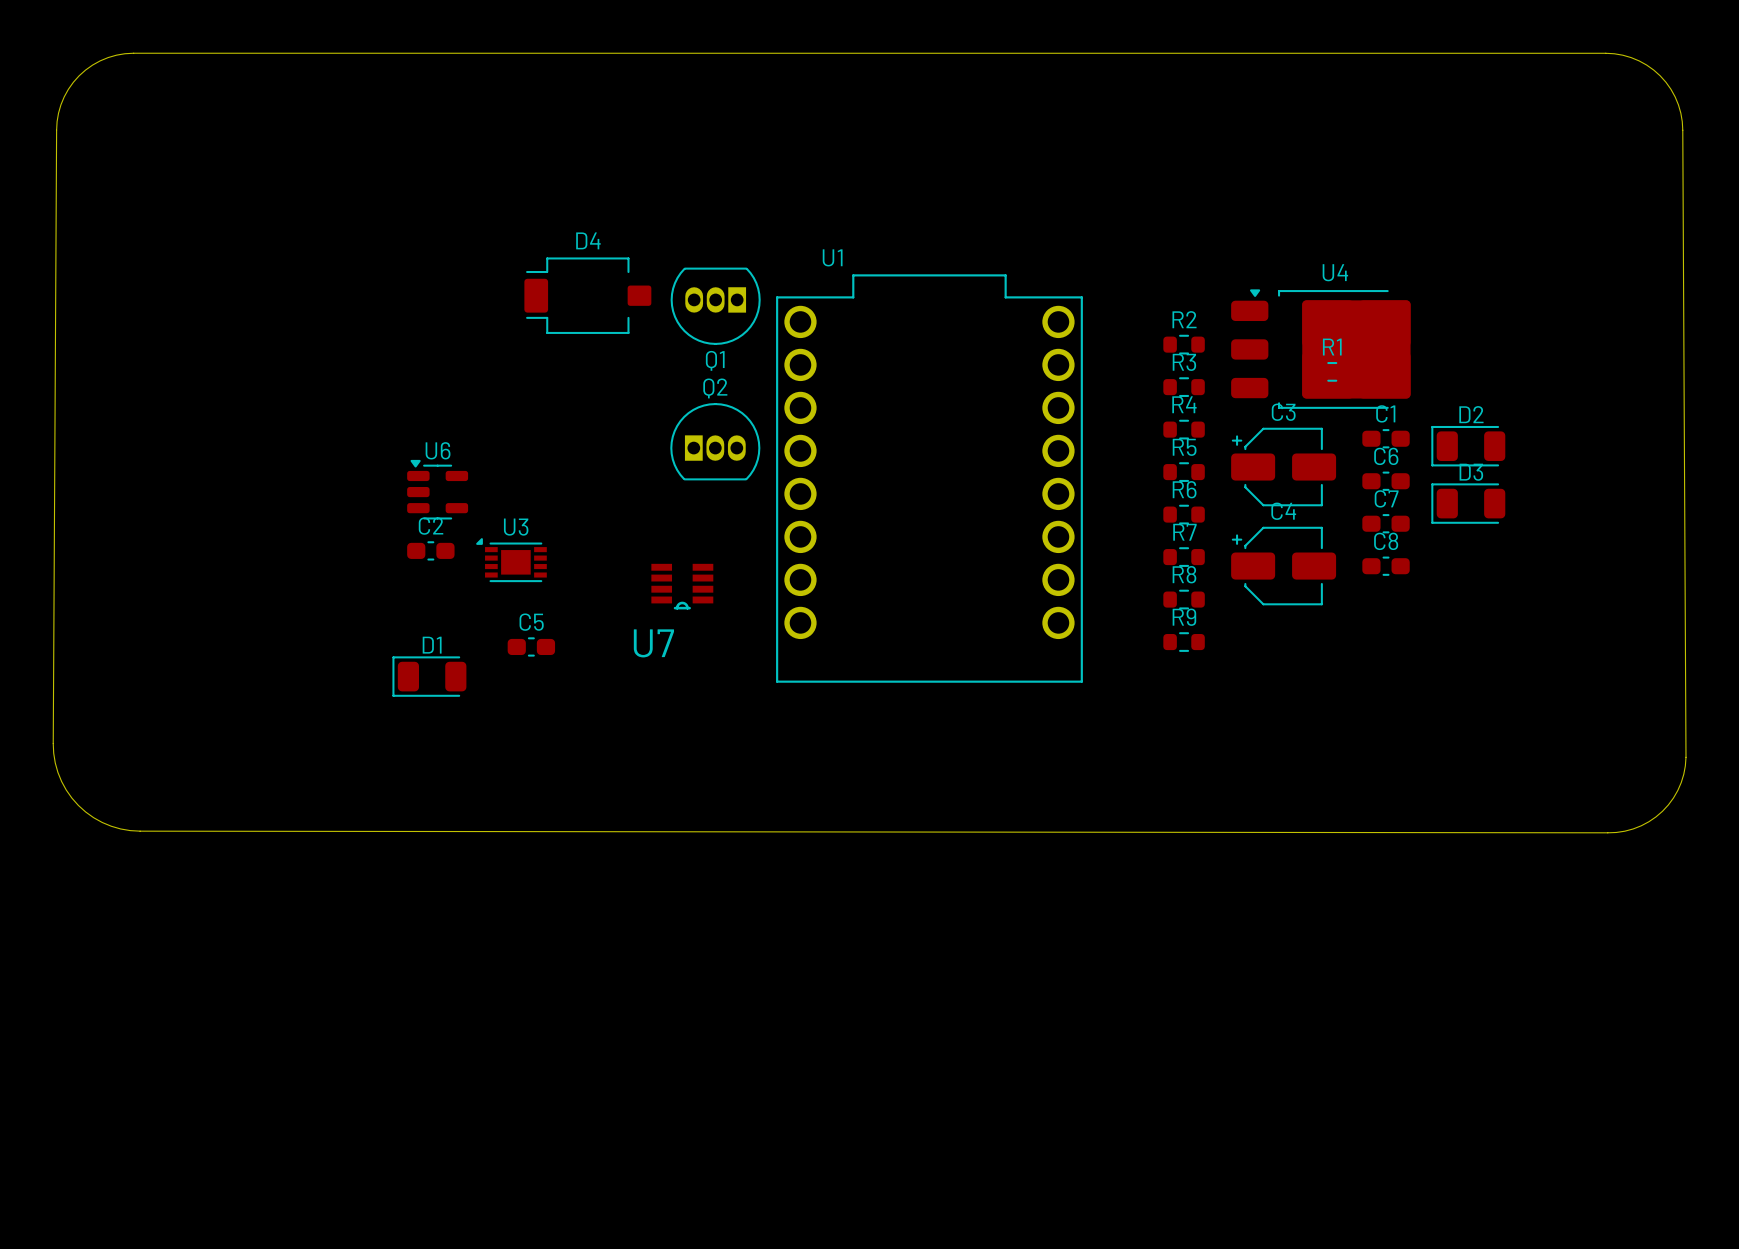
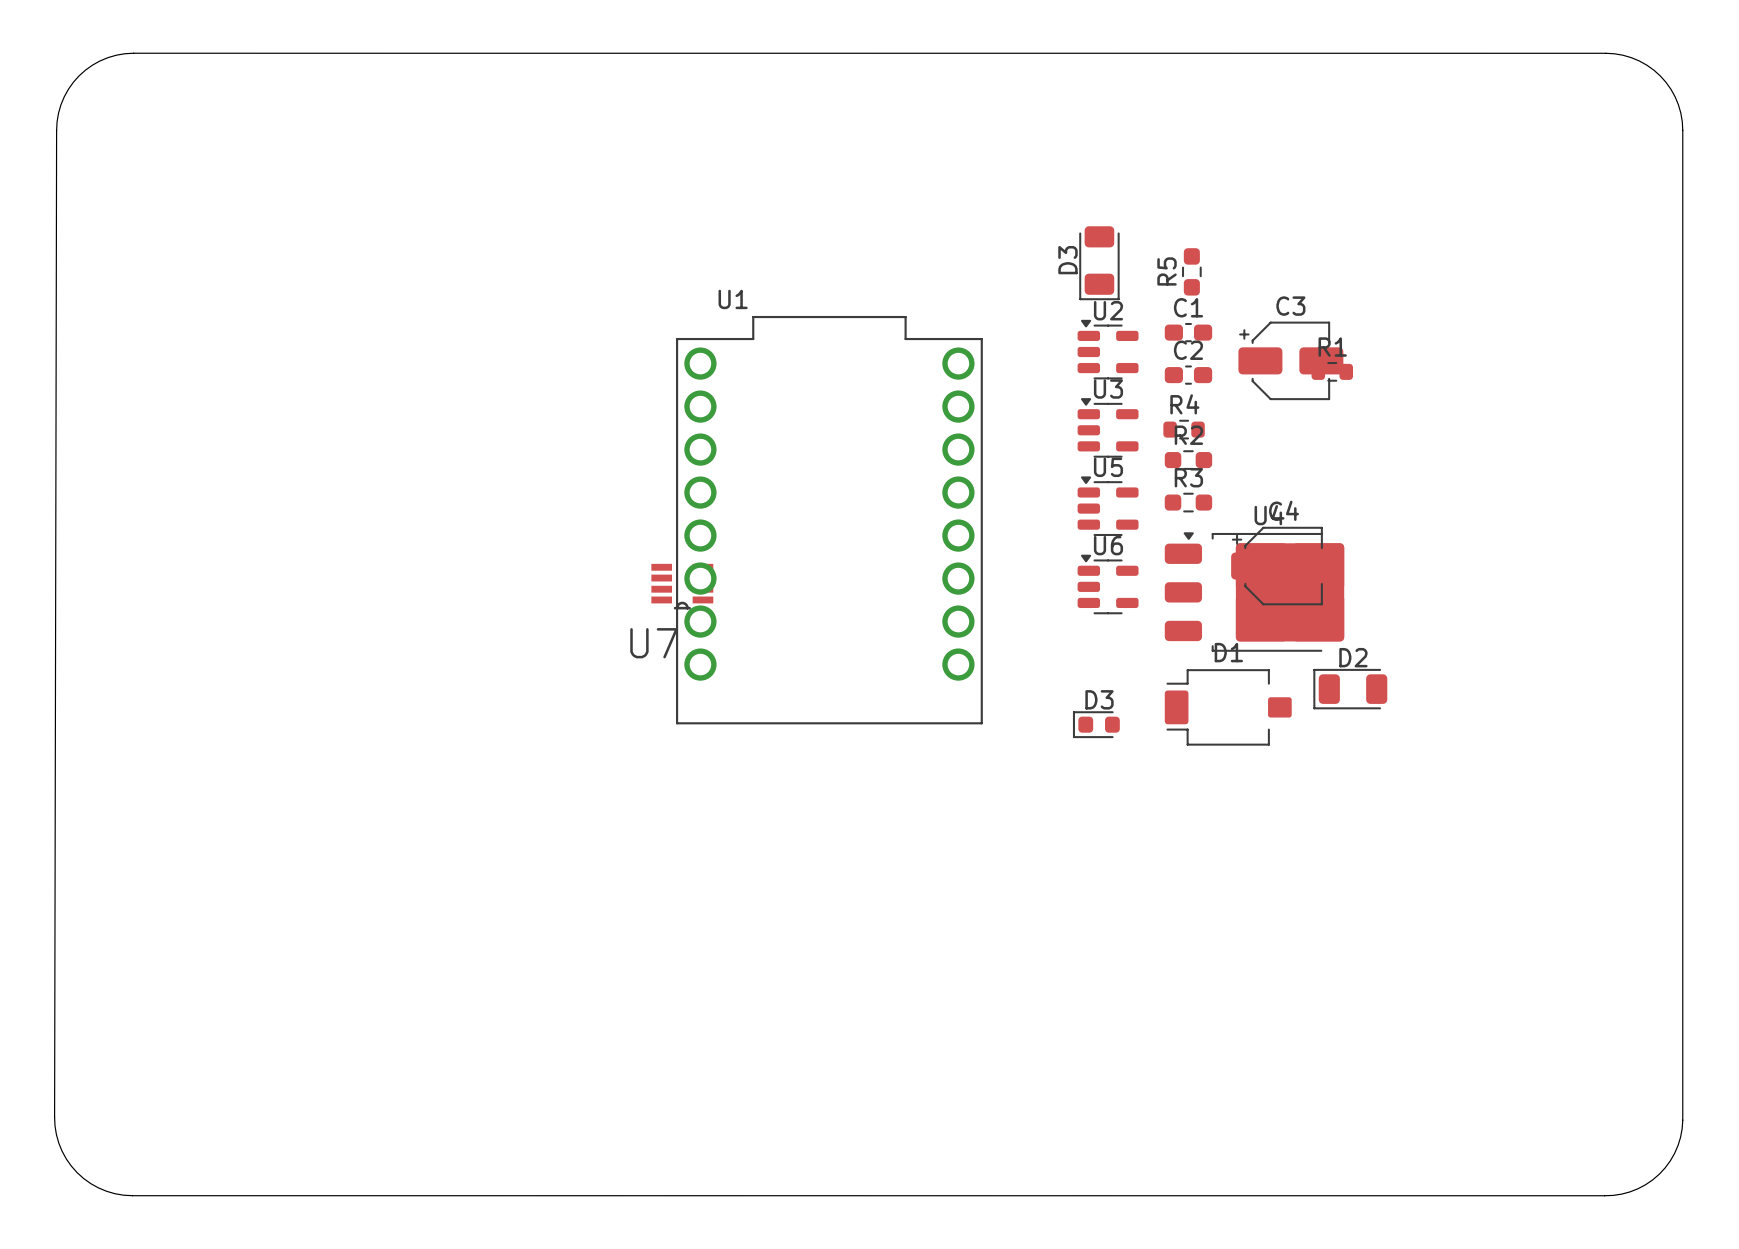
board edge: (56, 130) (53, 753) (57, 772) (66, 790) (78, 805) (102, 822) (120, 828) (140, 831) (1607, 832) (1633, 828) (1655, 816) (1673, 798) (1681, 782) (1685, 765) (1682, 130) -> (56, 130) (54, 1117) (56, 1134) (66, 1158) (77, 1172) (90, 1183) (115, 1193) (132, 1195) (1604, 1195) (1630, 1191) (1645, 1184) (1659, 1174) (1674, 1153) (1680, 1137) (1682, 1120) (1682, 130)
D3: none -> (1099, 263)
D4: (587, 295) -> none
Q1: (715, 306) -> none
R2 footprint: [1163, 334, 1205, 355] -> [1164, 450, 1213, 470]
U2: none -> (1108, 349)
U4 position: (1320, 349) -> (1254, 592)
R3 footprint: [1163, 377, 1205, 397] -> [1164, 492, 1213, 513]
C1 position: (1386, 438) -> (1188, 332)
Q2: (715, 441) -> none
D2 position: (1468, 446) -> (1350, 689)
R5 name position: R5 (1184, 447) -> R5 (1167, 271)
R5 footprint: [1163, 462, 1205, 482] -> [1182, 248, 1202, 296]
C3 position: (1283, 467) -> (1290, 360)
U1 position: (929, 478) -> (829, 520)
C6: (1386, 481) -> none
U6 position: (437, 489) -> (1108, 584)
D3: (1468, 503) -> none
U5: none -> (1108, 506)
R6: (1184, 514) -> none
C7: (1386, 523) -> none
U3 footprint: [476, 538, 547, 583] -> [1077, 398, 1139, 458]
C2 position: (430, 550) -> (1188, 375)
R7: (1184, 557) -> none
C8: (1386, 566) -> none
R8: (1184, 599) -> none
R9: (1184, 642) -> none
C5: (531, 646) -> none
D1 footprint: [392, 656, 467, 697] -> [1164, 669, 1292, 746]
D3: none -> (1096, 724)

